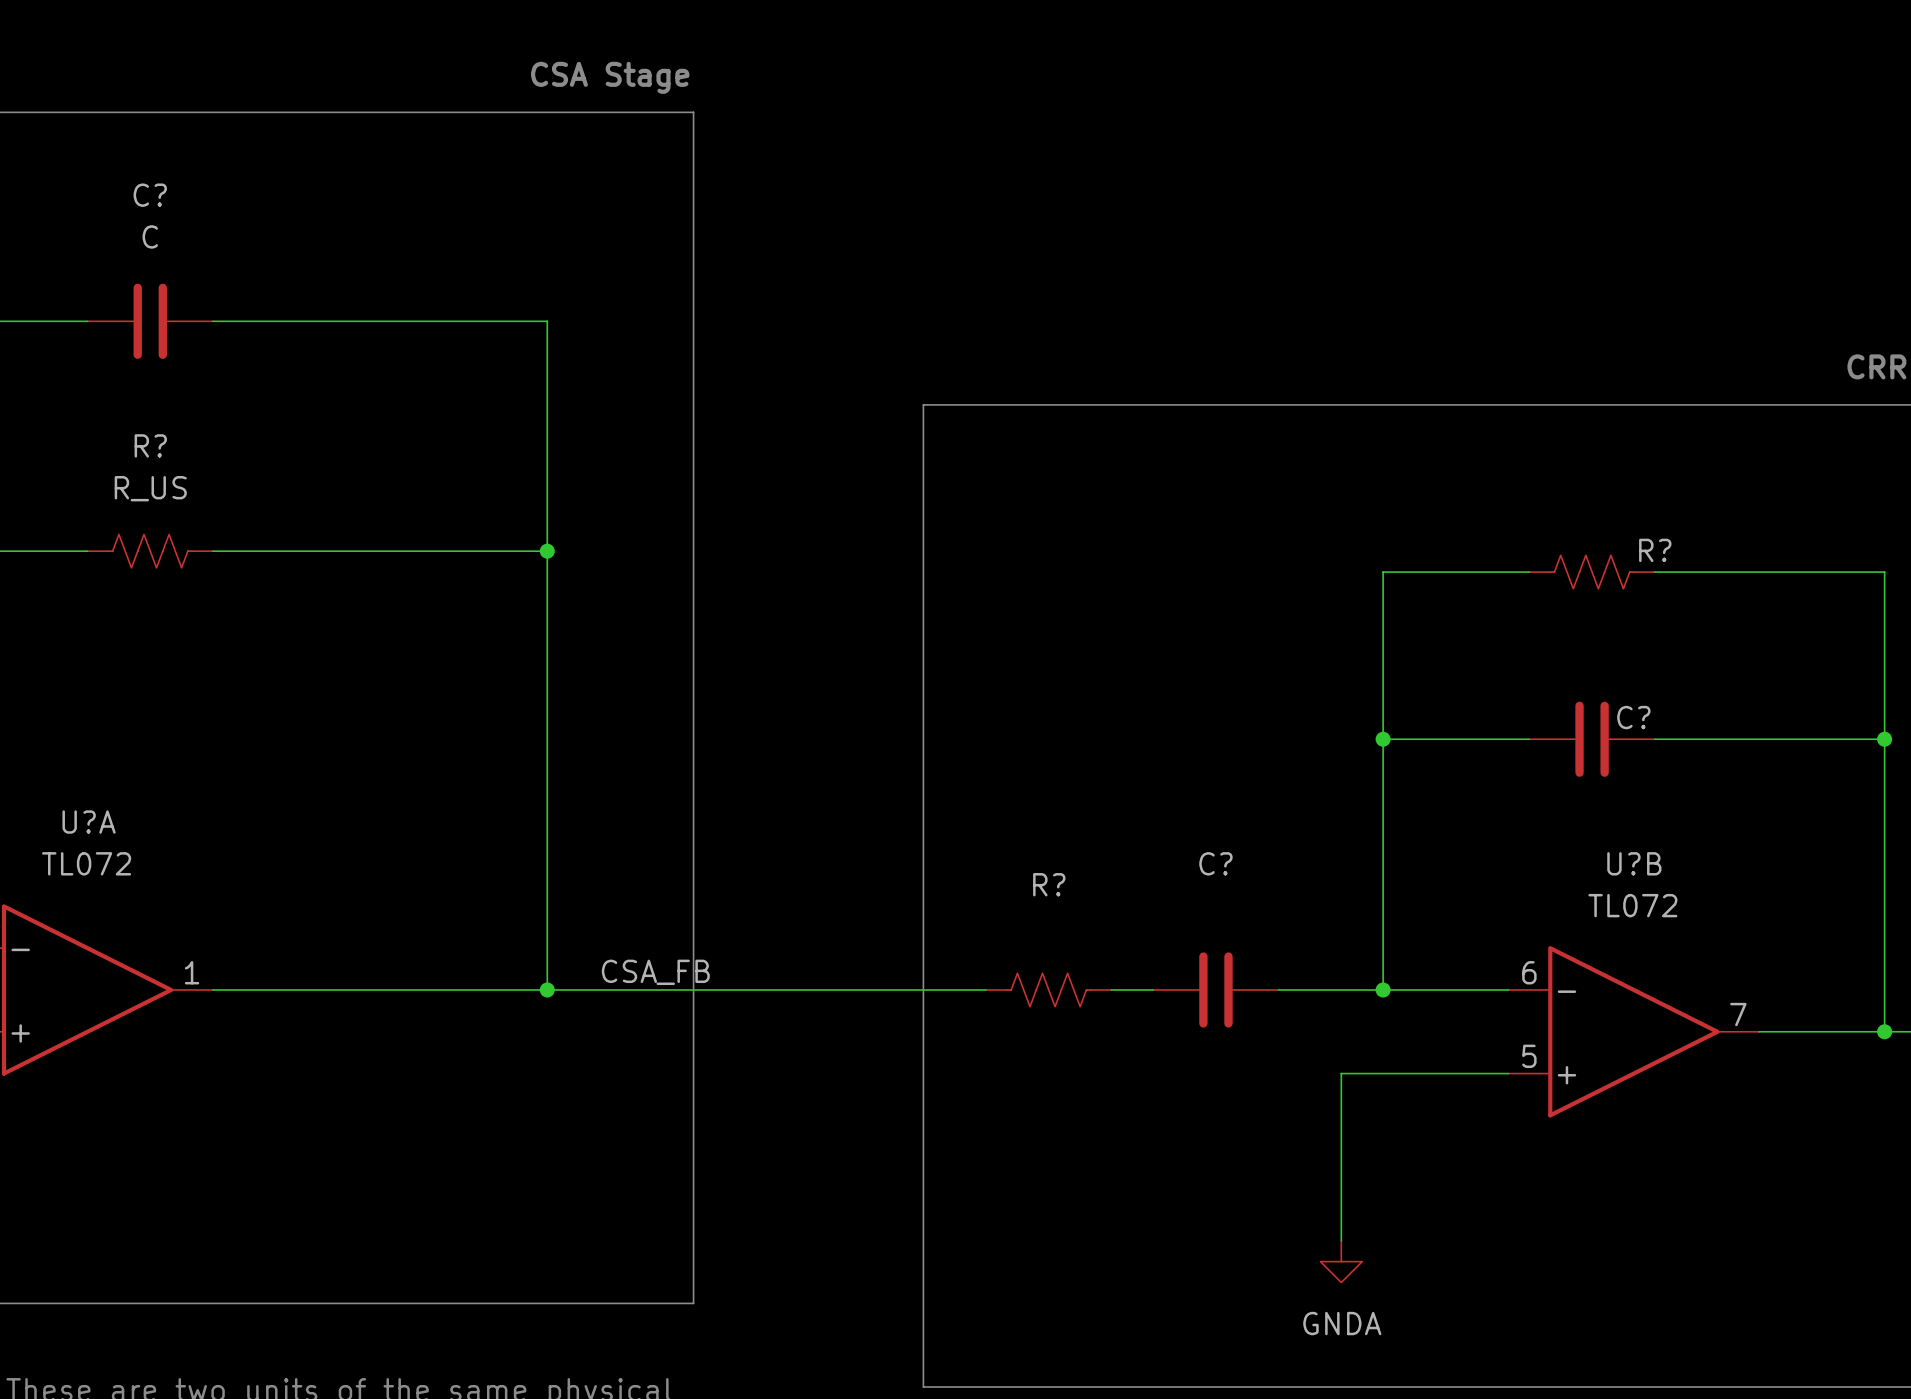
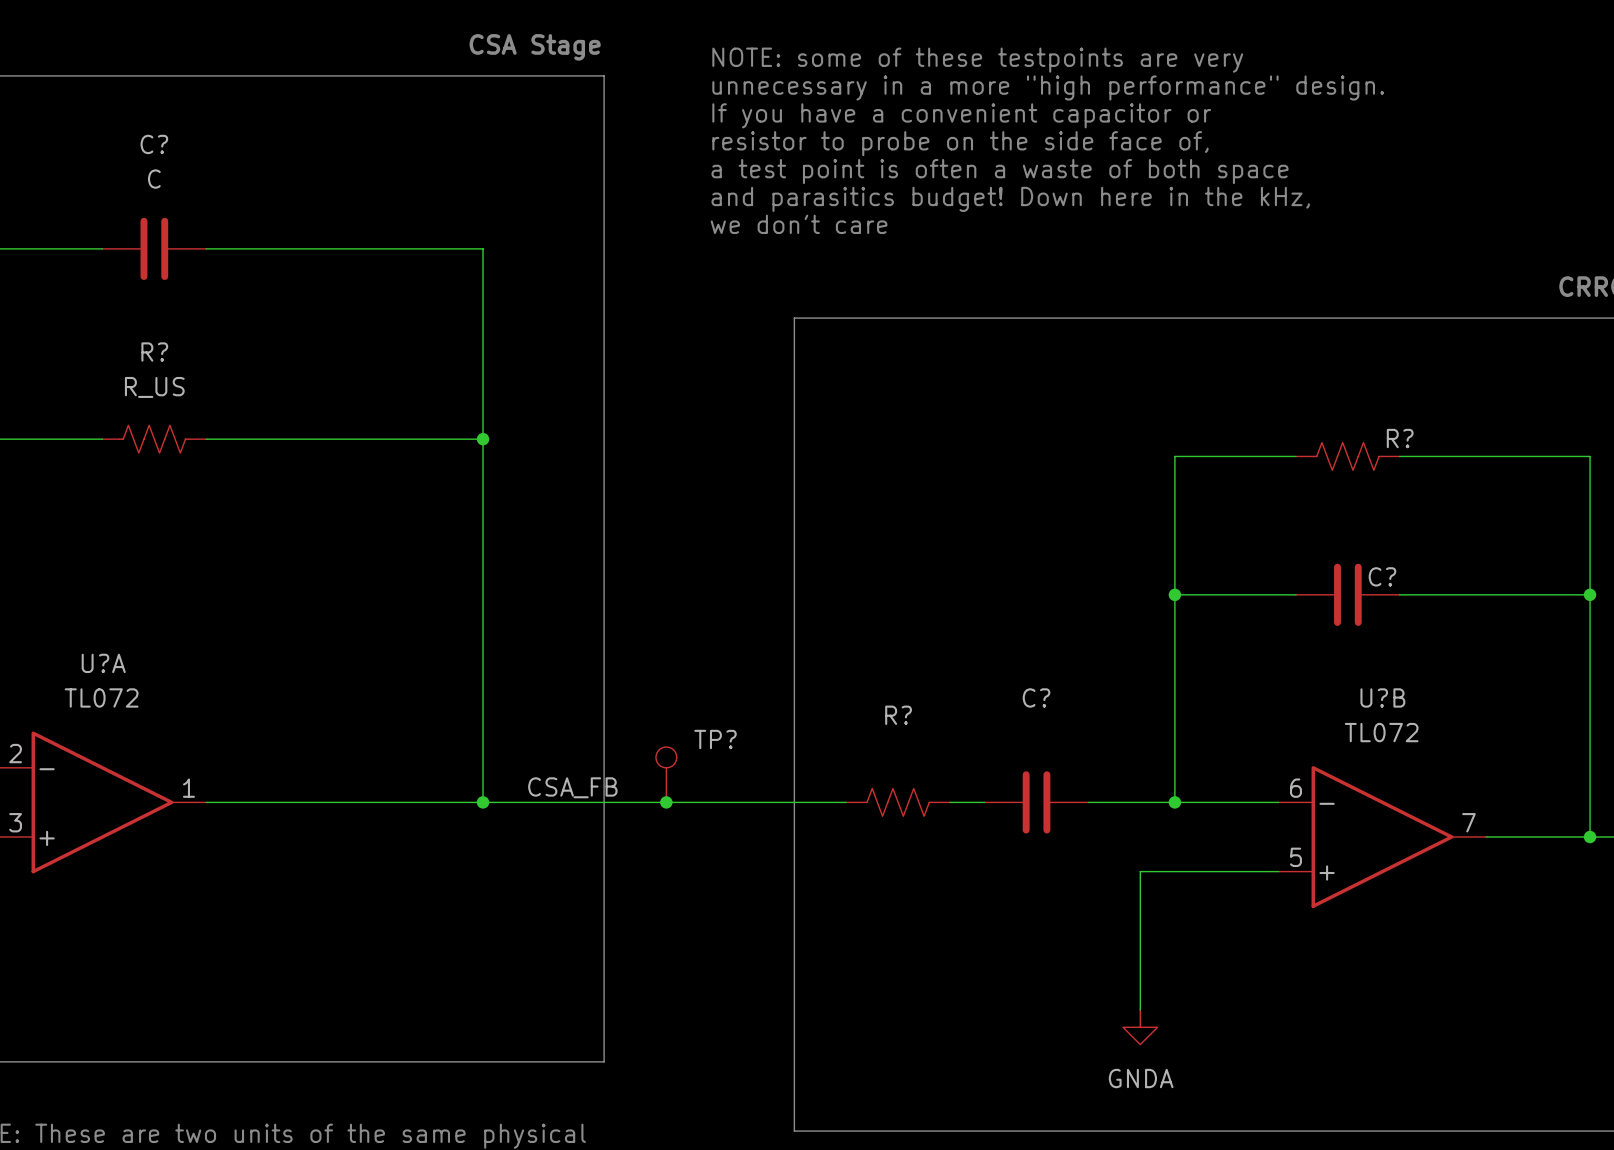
text: none -> NOTE: some of these testpoints are very (977, 60)
text: none -> unnecessary in a more "high performance" design. (1048, 87)
text: none -> If you have a convenient capacitor or (961, 115)
text: none -> resistor to probe on the side face of, (960, 143)
text: none -> a test point is often a waste of both space (1000, 171)
text: none -> and parasitics budget! Down here in the kHz, (1010, 199)
text: none -> we don't care (799, 224)
TP?: none -> (666, 774)
junction: none -> (666, 802)

